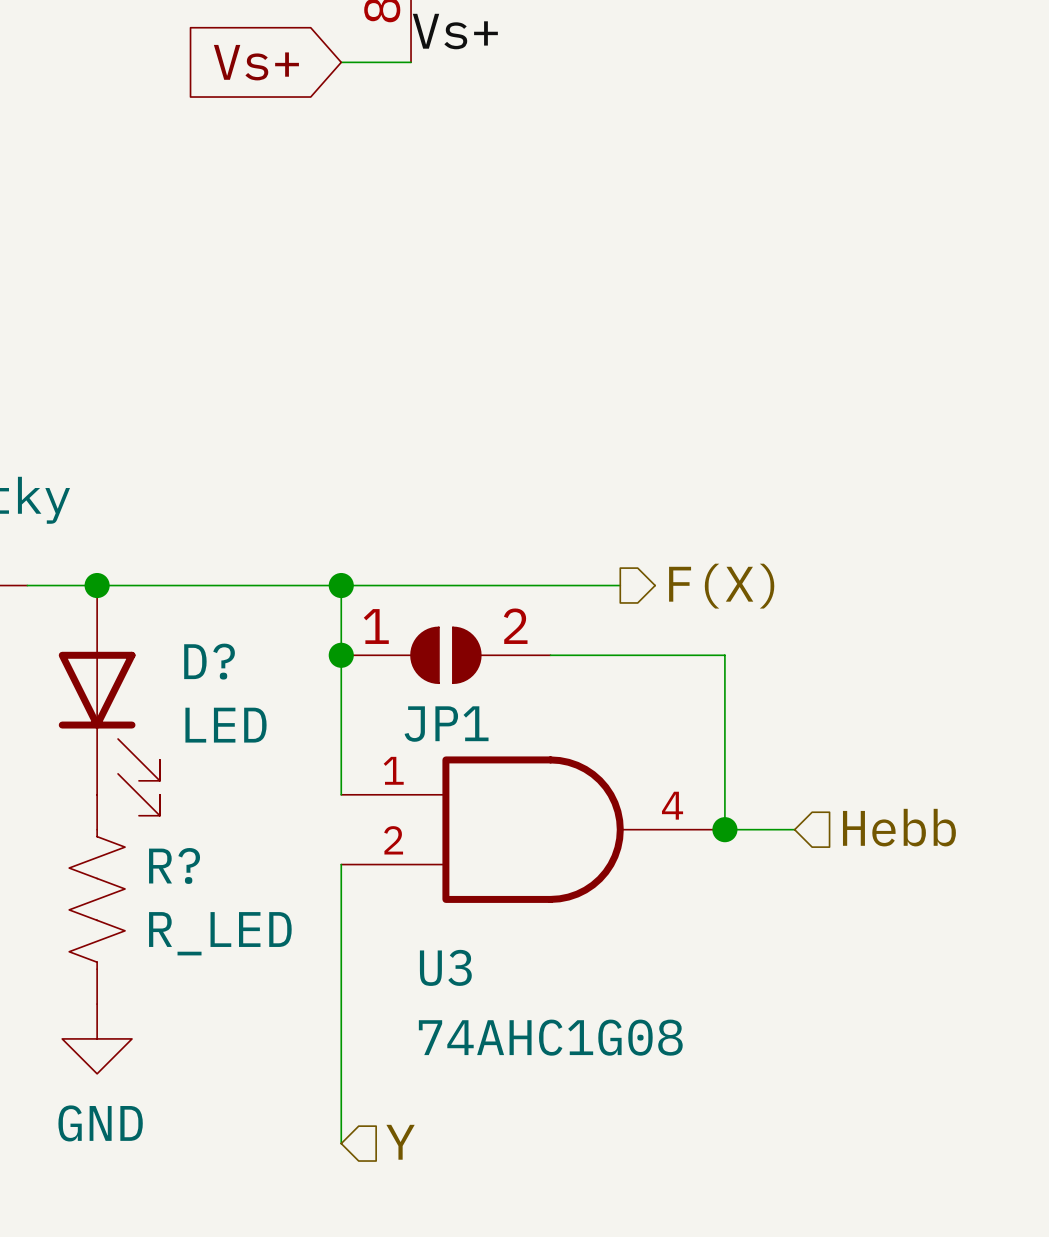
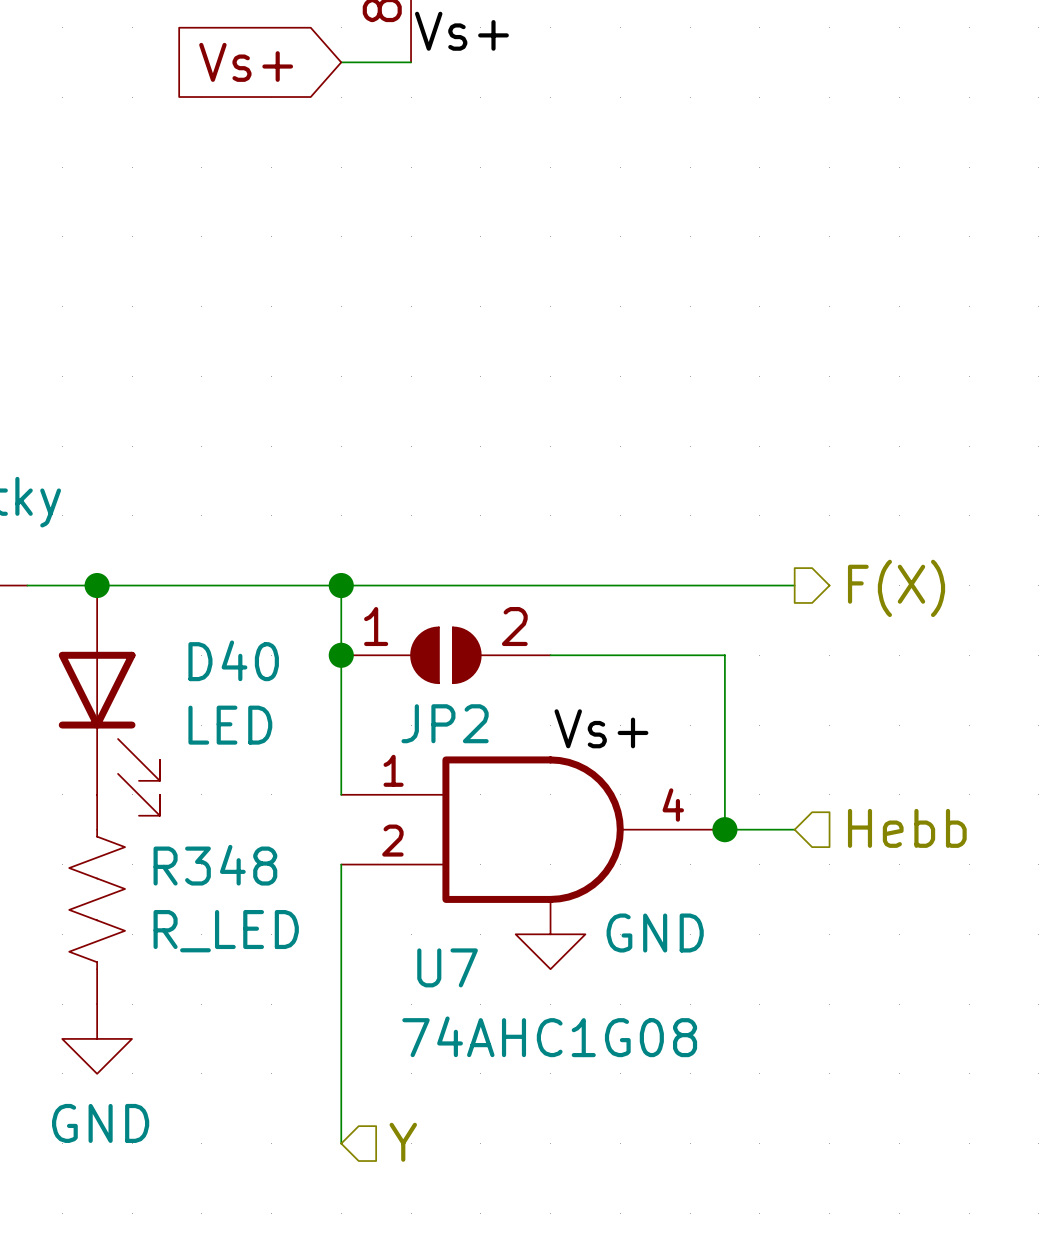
wire: none -> (620, 585) (794, 585)
hierarchical label position: F(X) (721, 586) -> F(X) (896, 588)
D? name: D? (209, 661) -> D40 (233, 660)
JP1 name: JP1 (446, 724) -> JP2 (445, 723)
label: none -> Vs+ (601, 728)
R? name: R? (174, 865) -> R348 (215, 865)
power symbol: none -> GND (550, 934)
U3 name: U3 (445, 967) -> U7 (447, 967)

